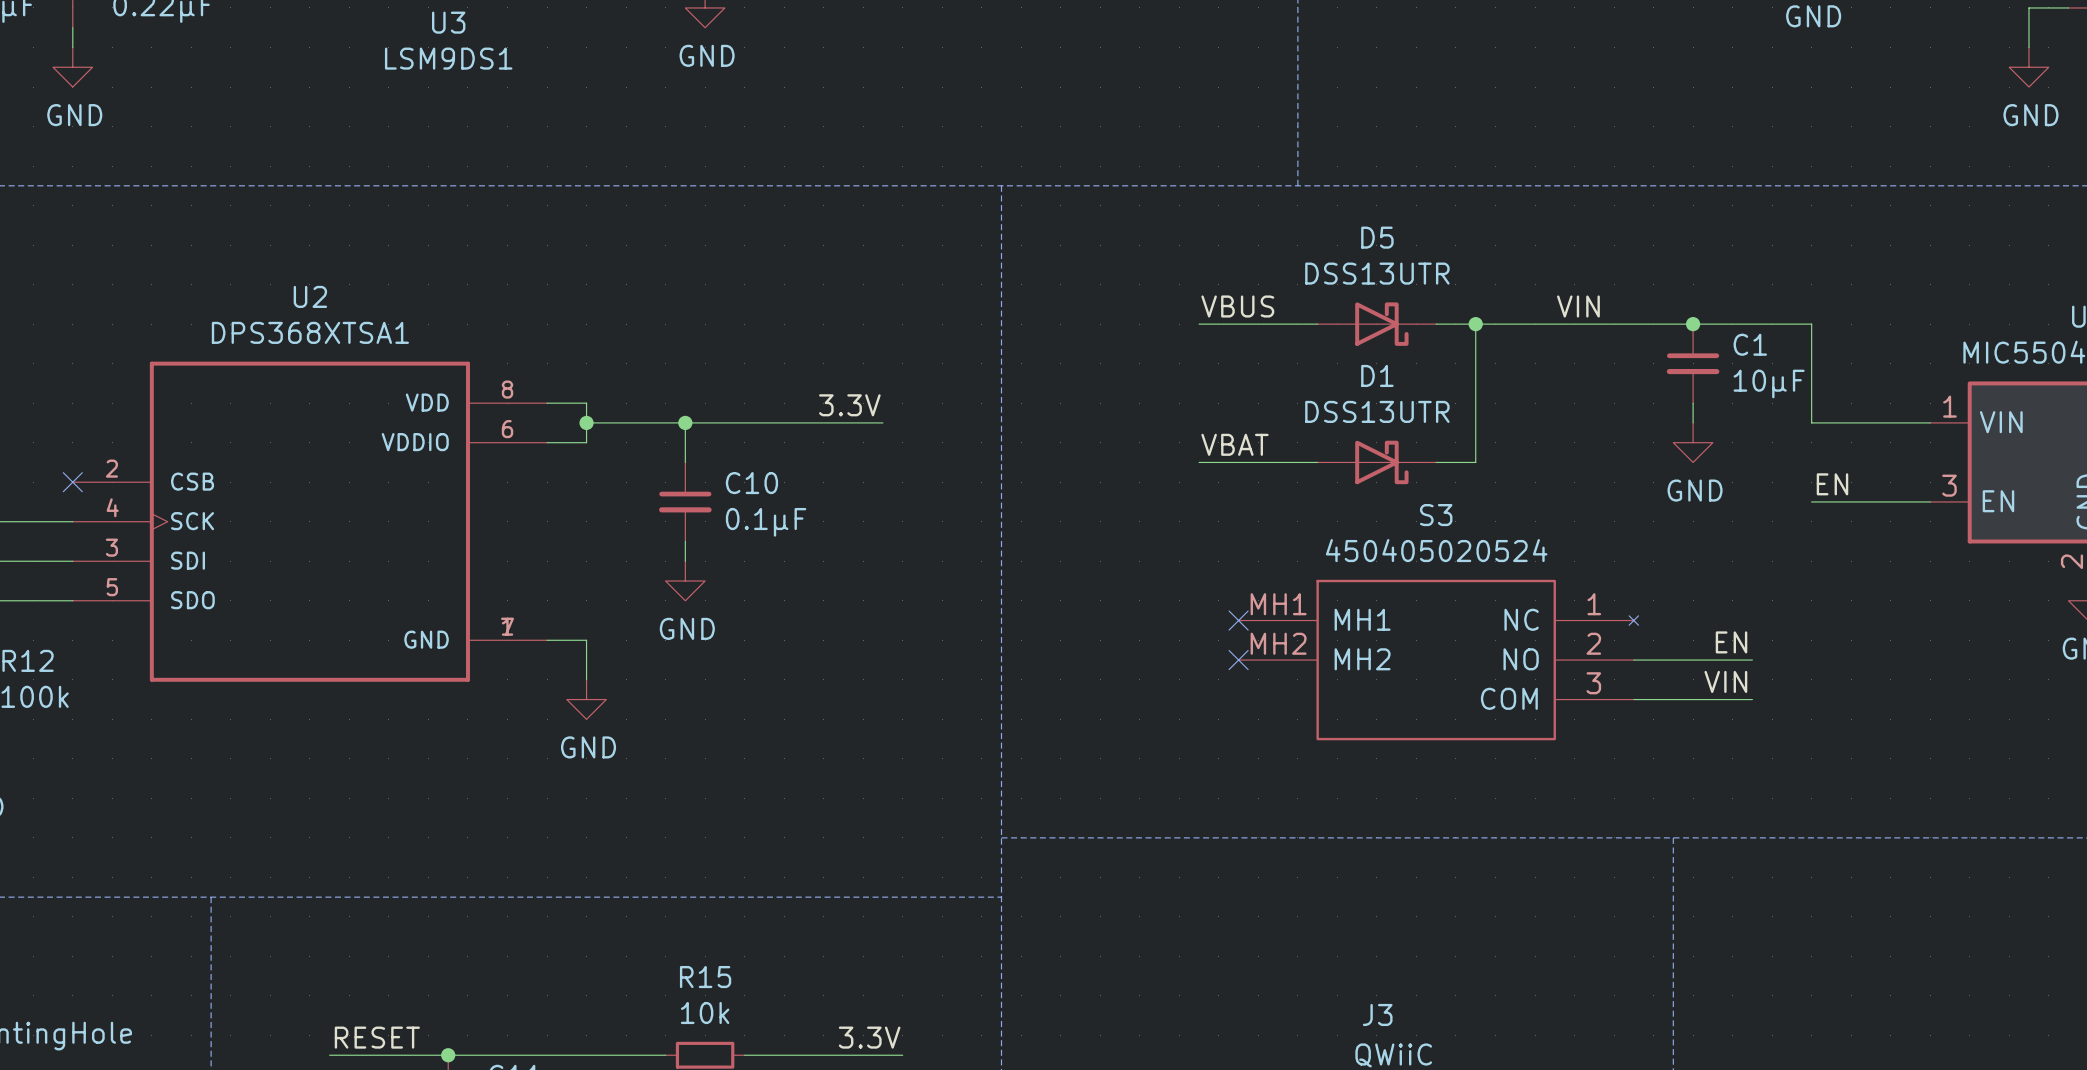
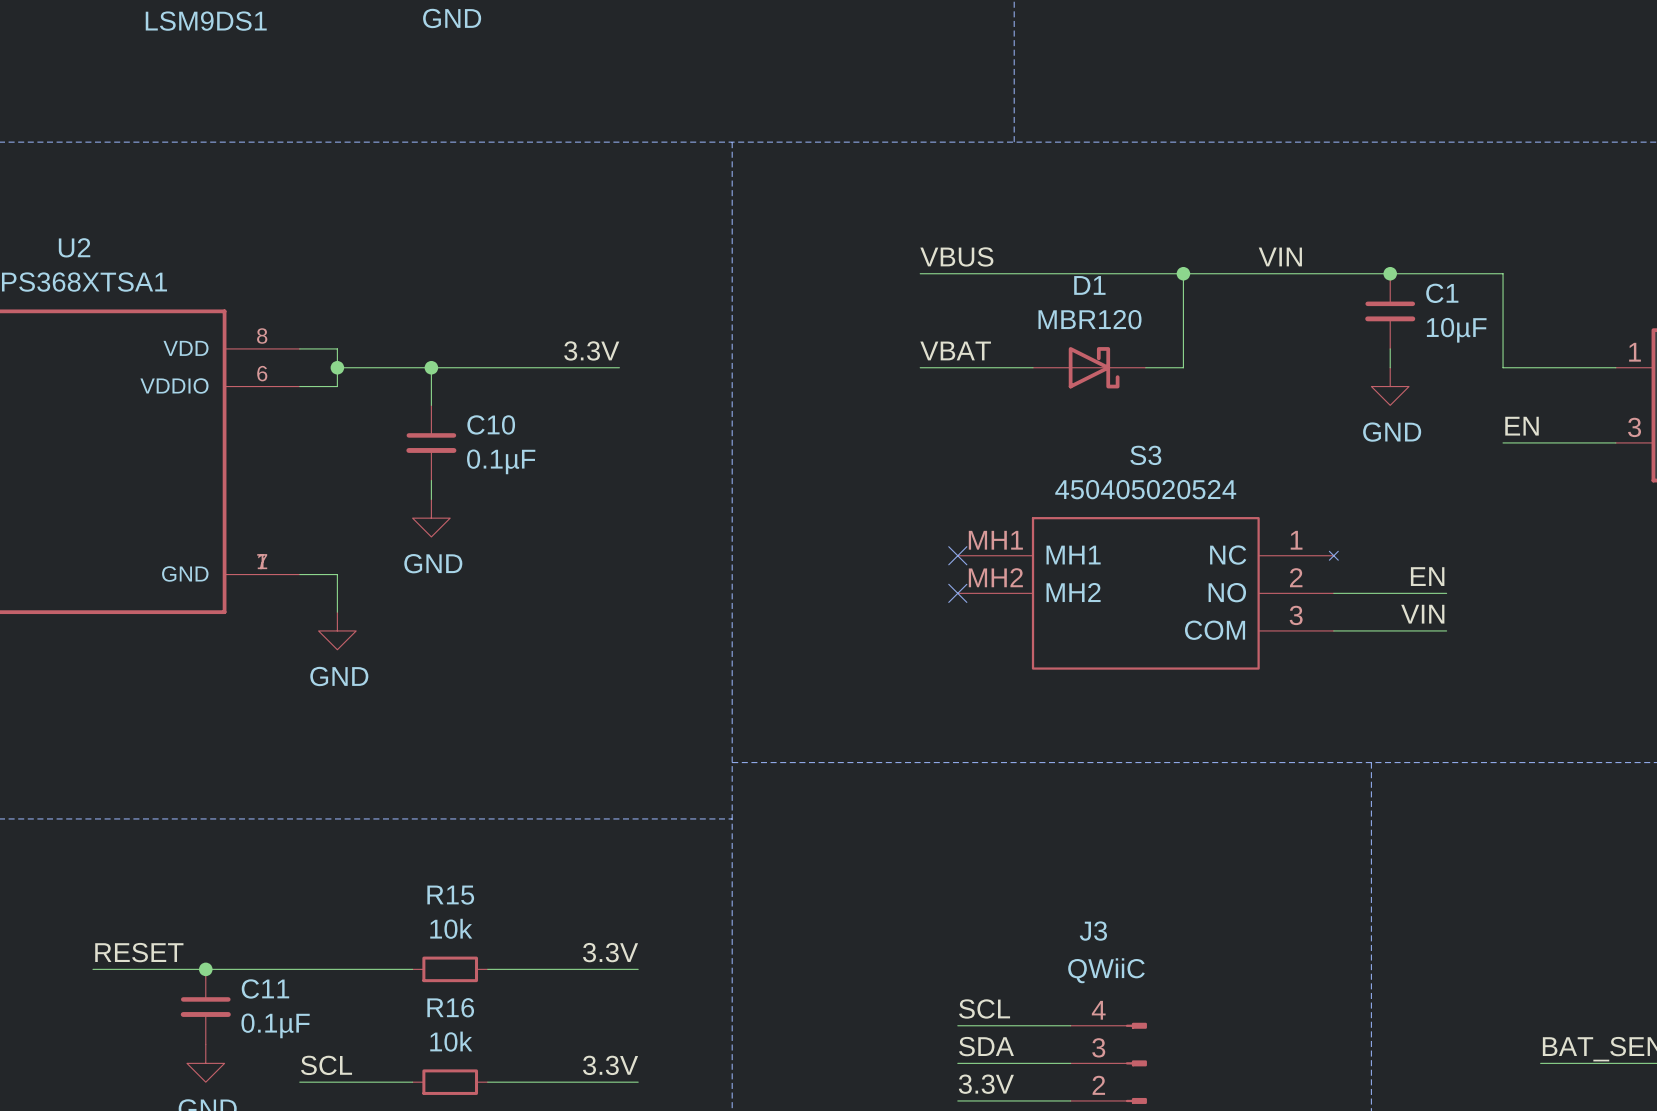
D5: DSS13UTR (1376, 324) -> none
D1 value: DSS13UTR (1377, 411) -> MBR120 (1090, 319)
wire: (1475, 422) (1475, 462) (1436, 462) -> (1183, 367) (1145, 367)
label position: VBAT (1235, 444) -> VBAT (955, 350)
wire: (1199, 462) (1317, 462) -> (920, 367) (1033, 367)
D1 position: (1376, 462) -> (1089, 367)

